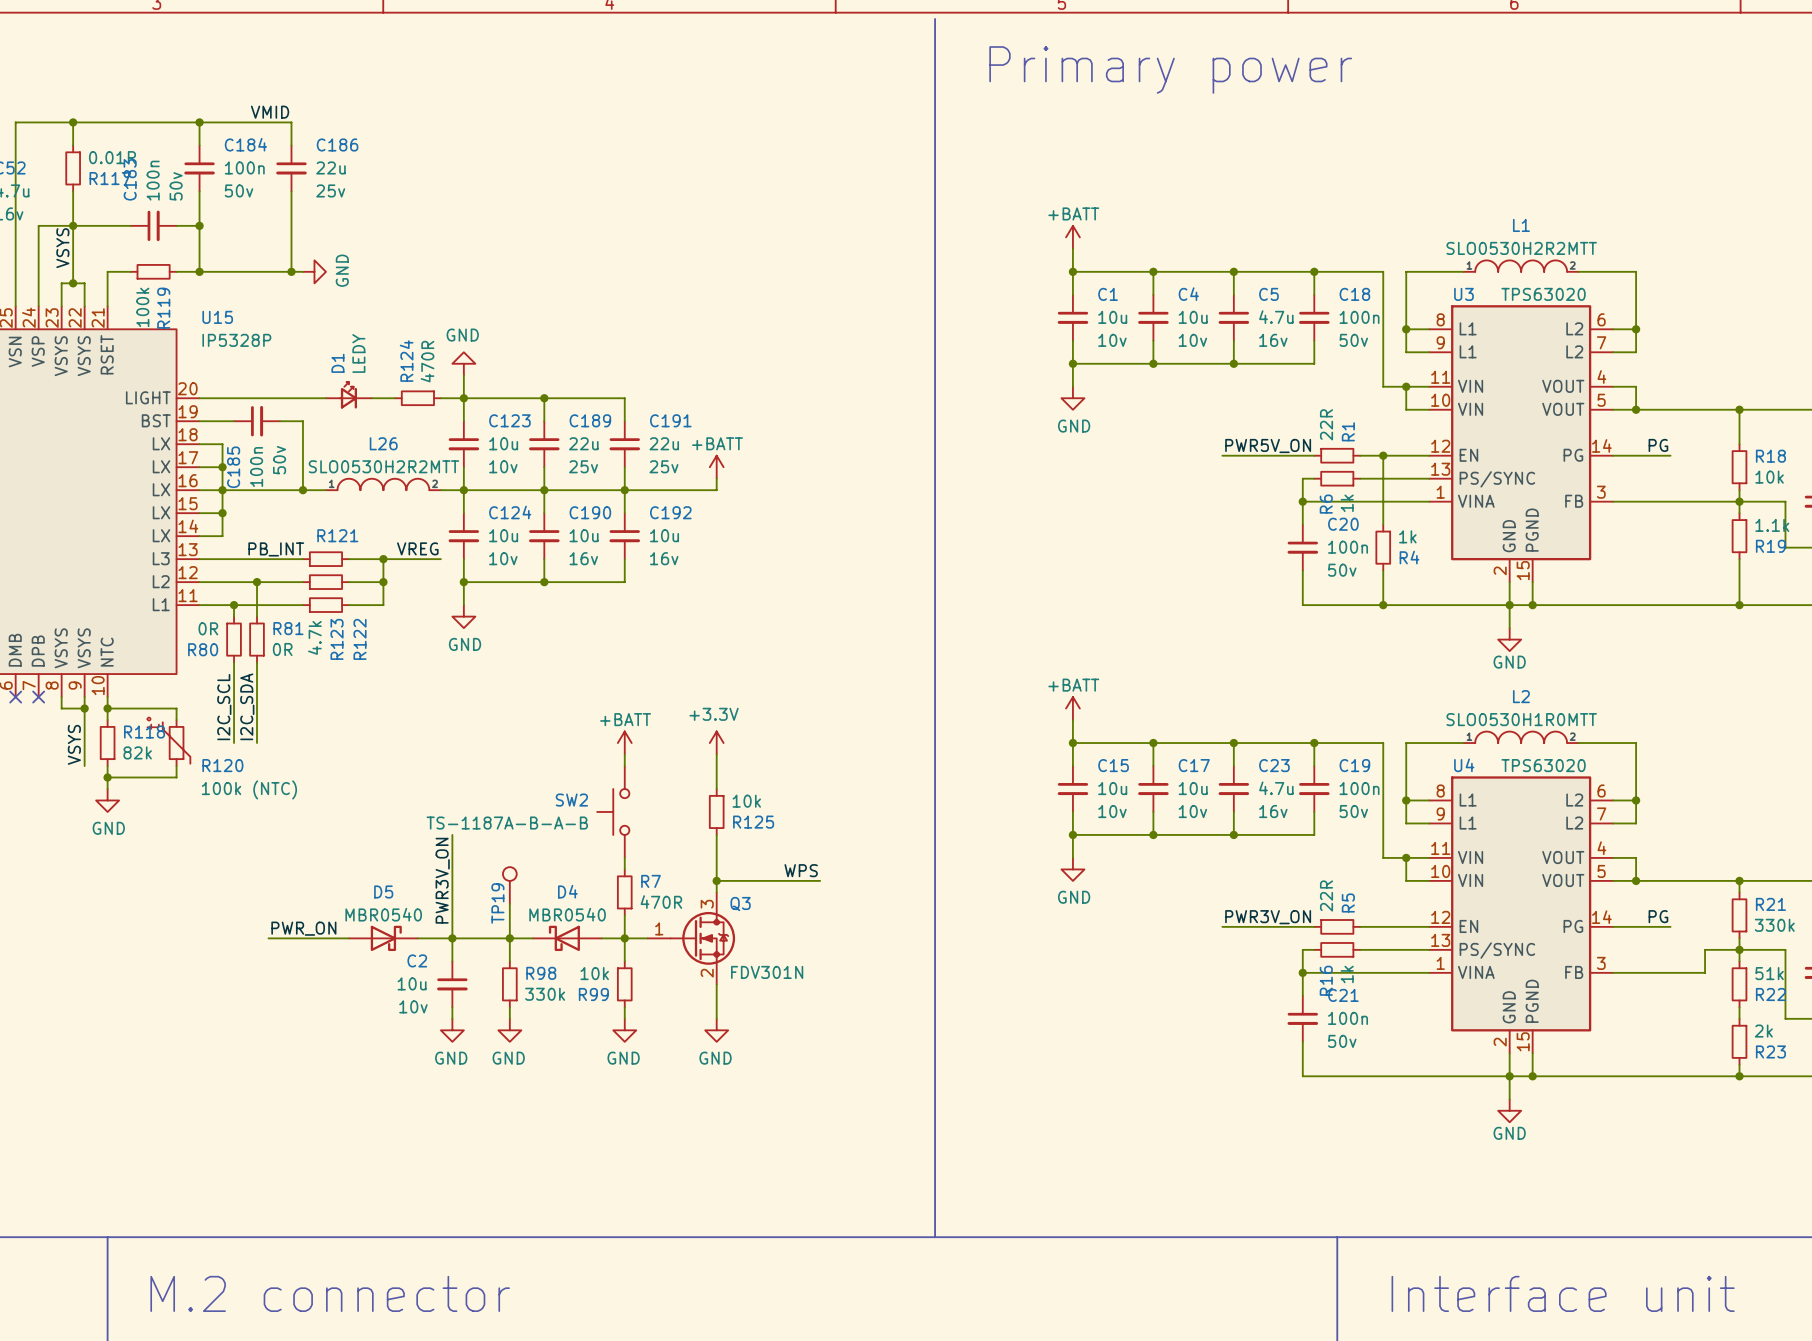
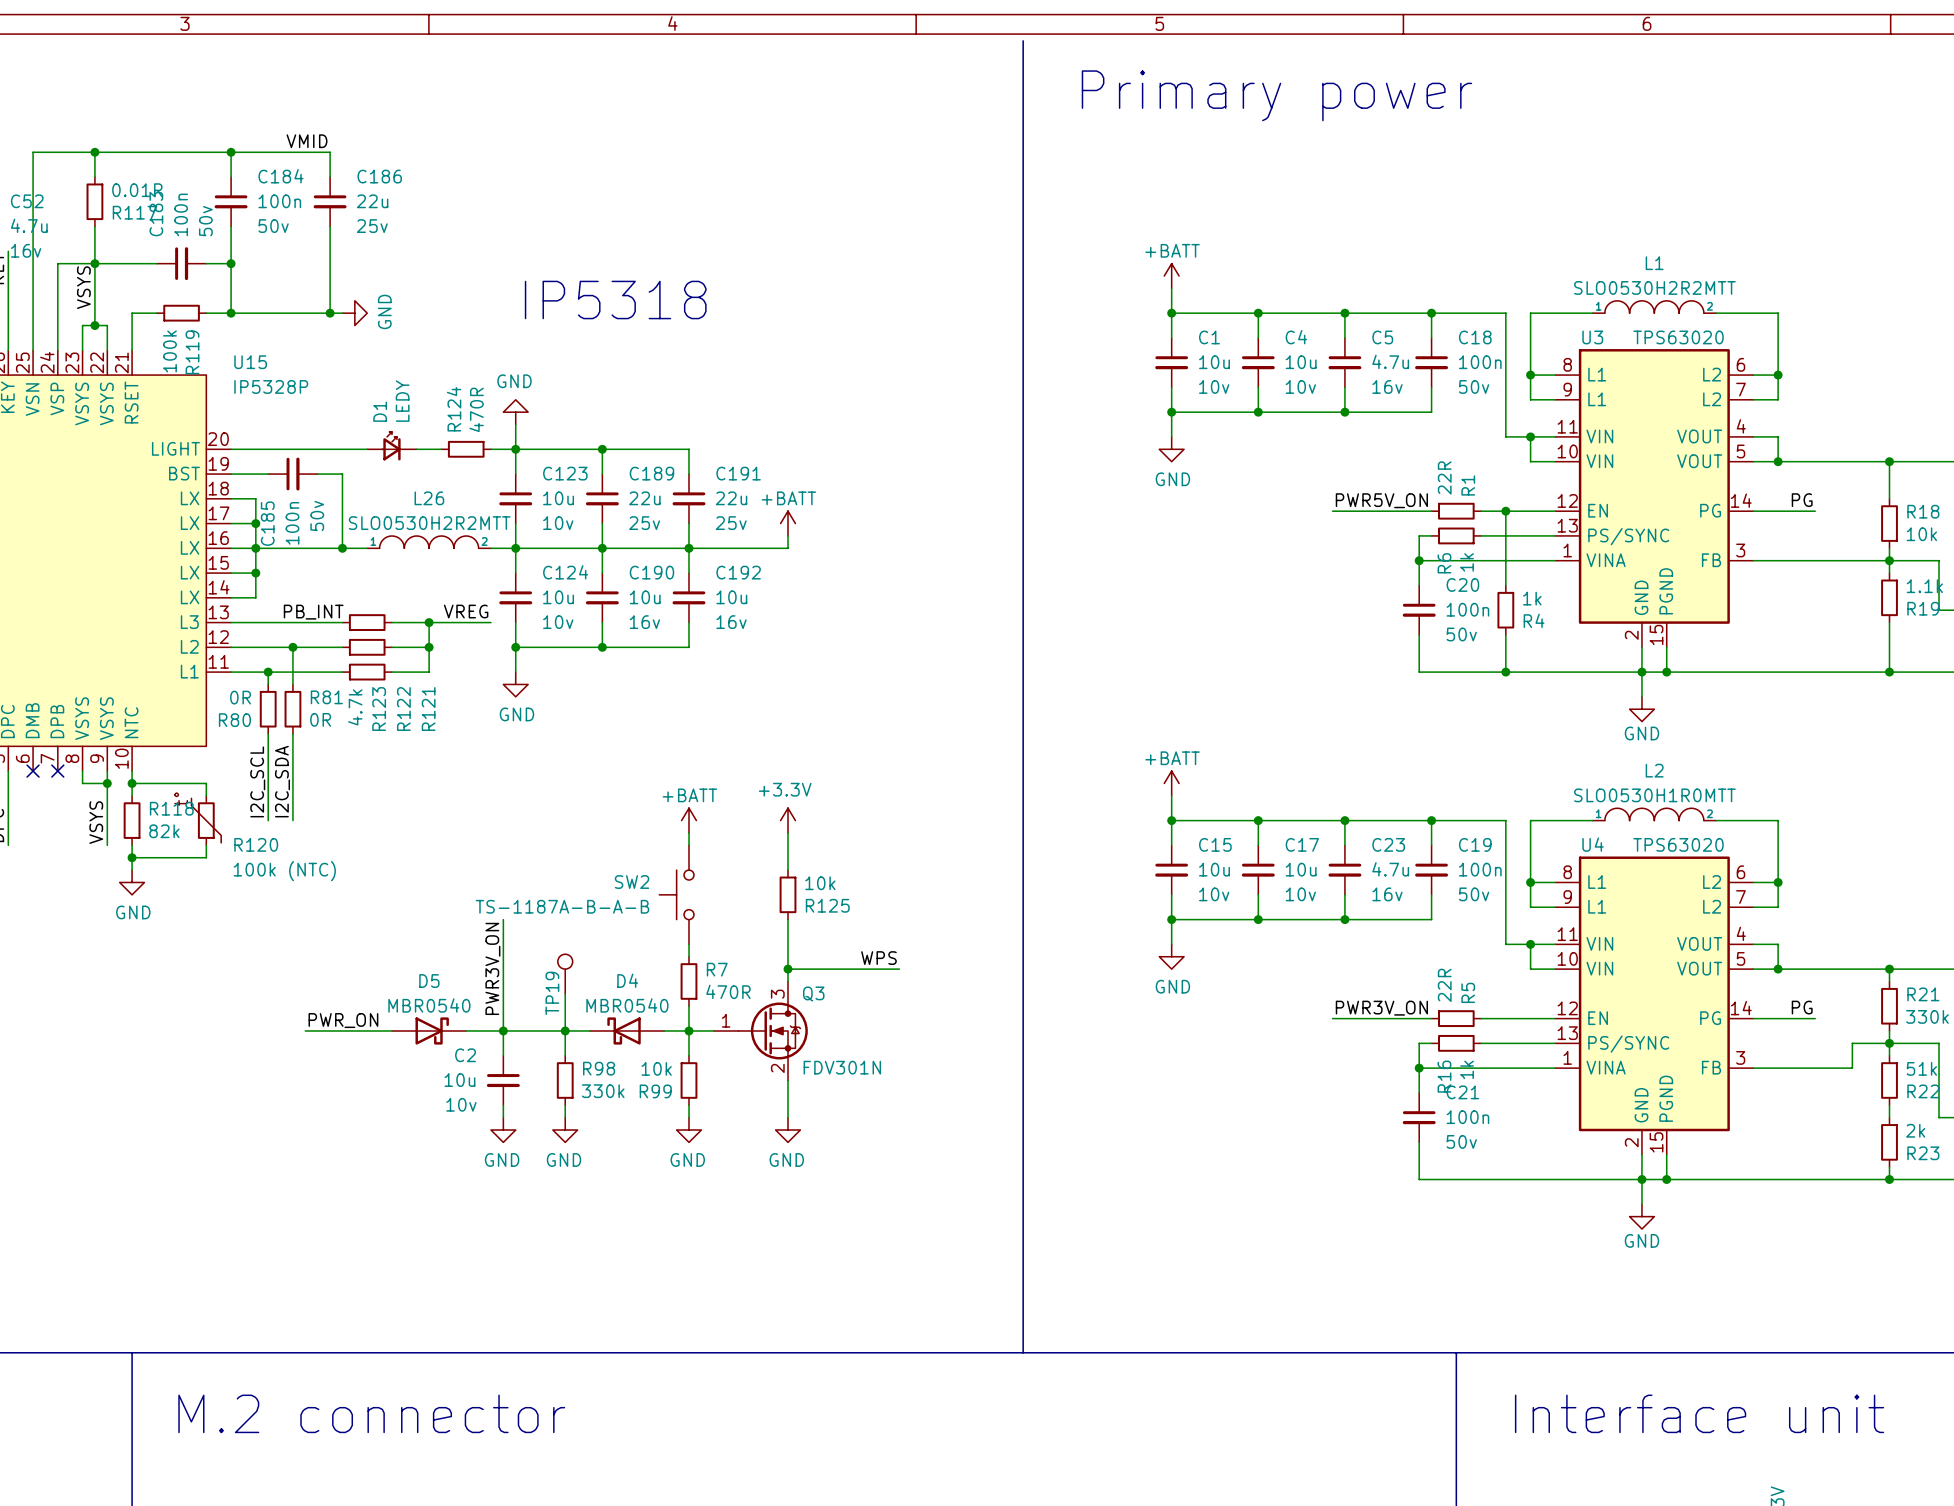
text: none -> IP5318 (615, 300)
R121 name rotation: 0° (337, 535) -> 90° counterclockwise (428, 709)
R121 name position: R121 (337, 535) -> R121 (428, 709)

